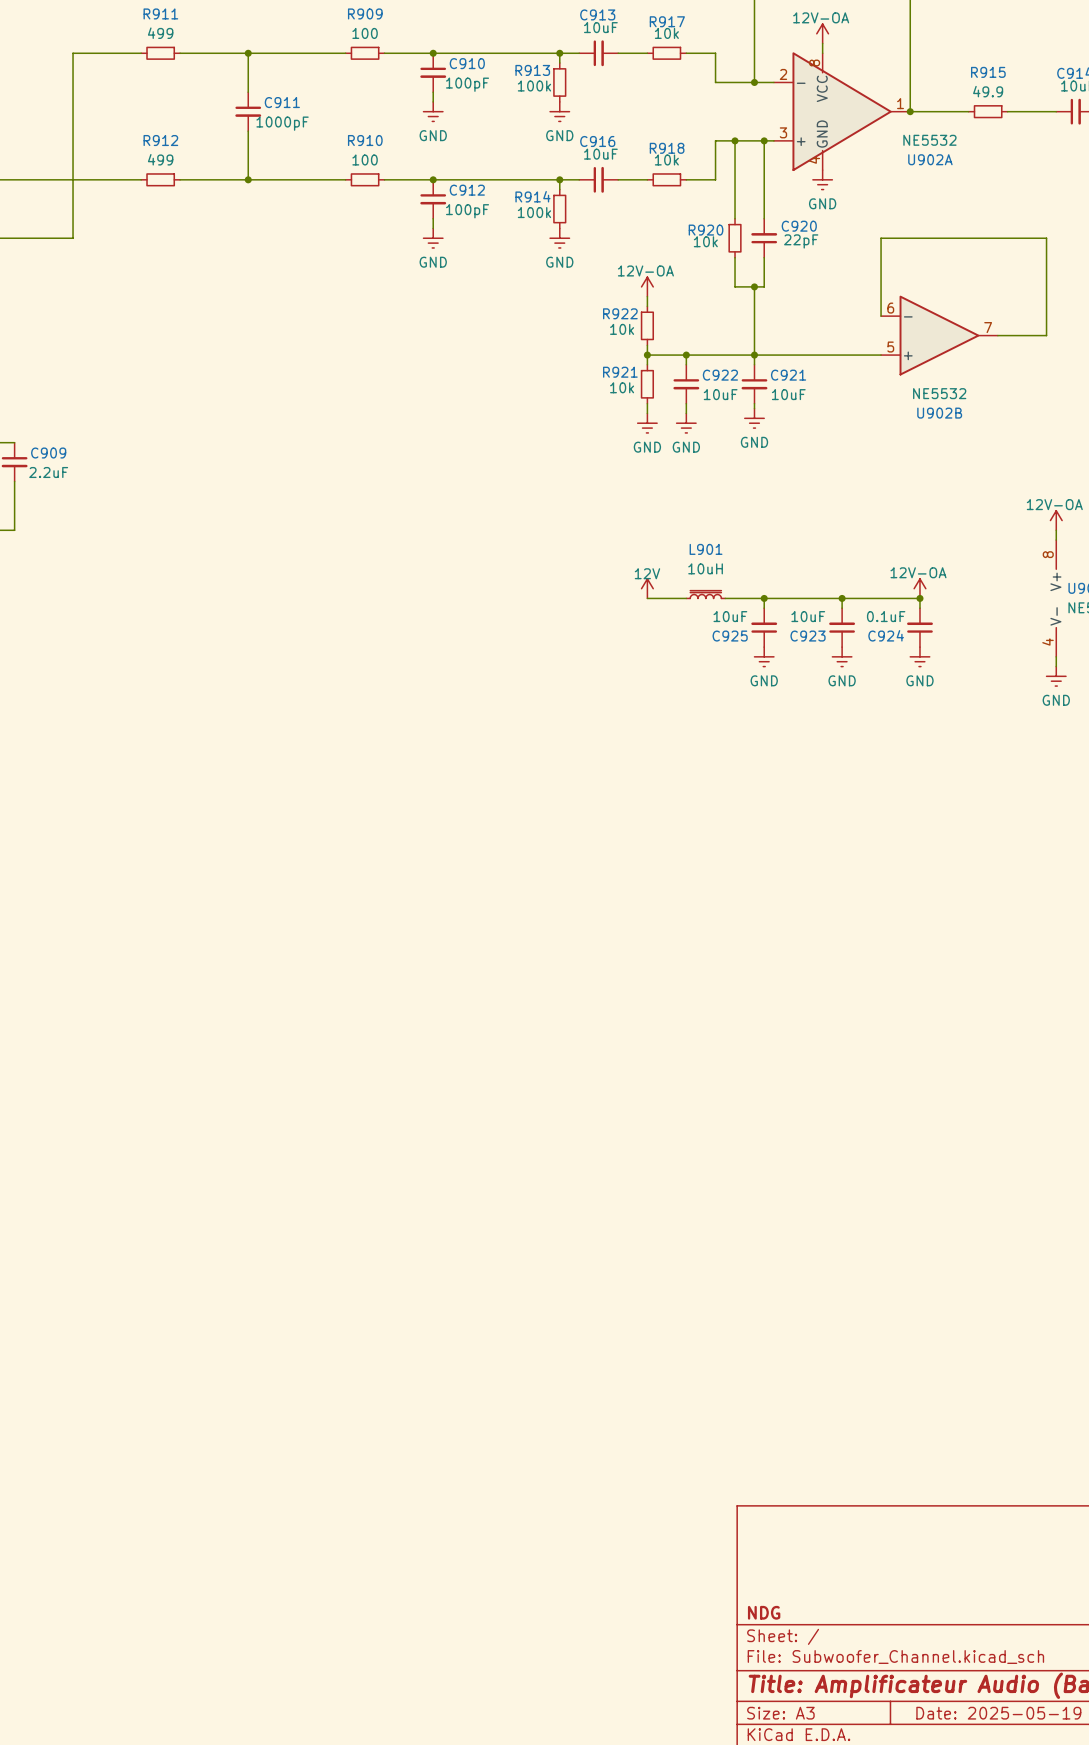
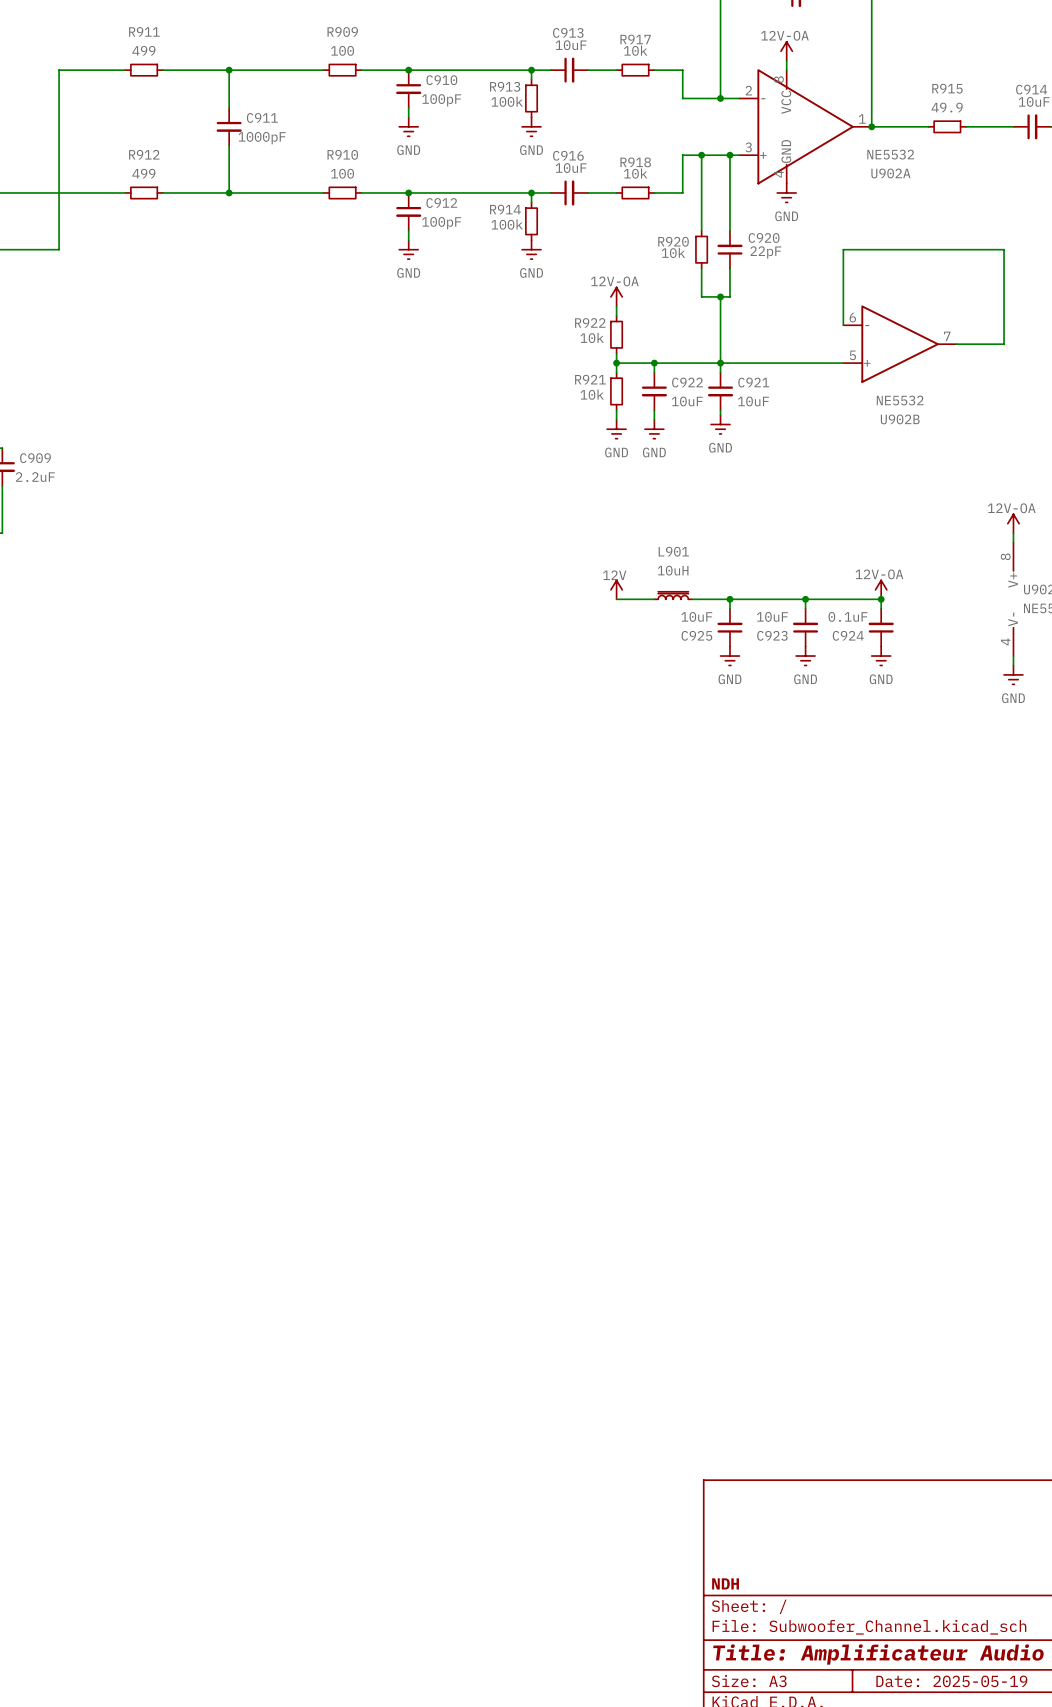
title block: NDG (764, 1612) -> NDH (725, 1583)

